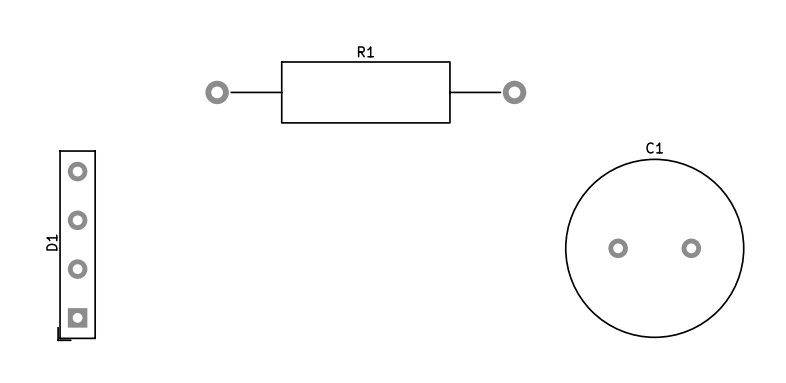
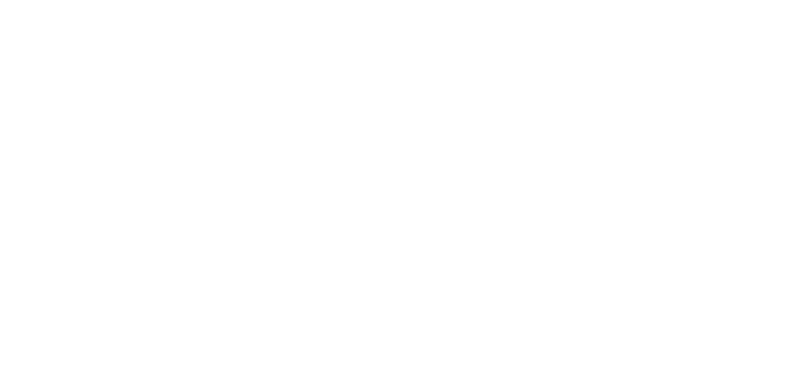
R1: (365, 92) -> none
D1: (76, 245) -> none
C1: (654, 248) -> none

